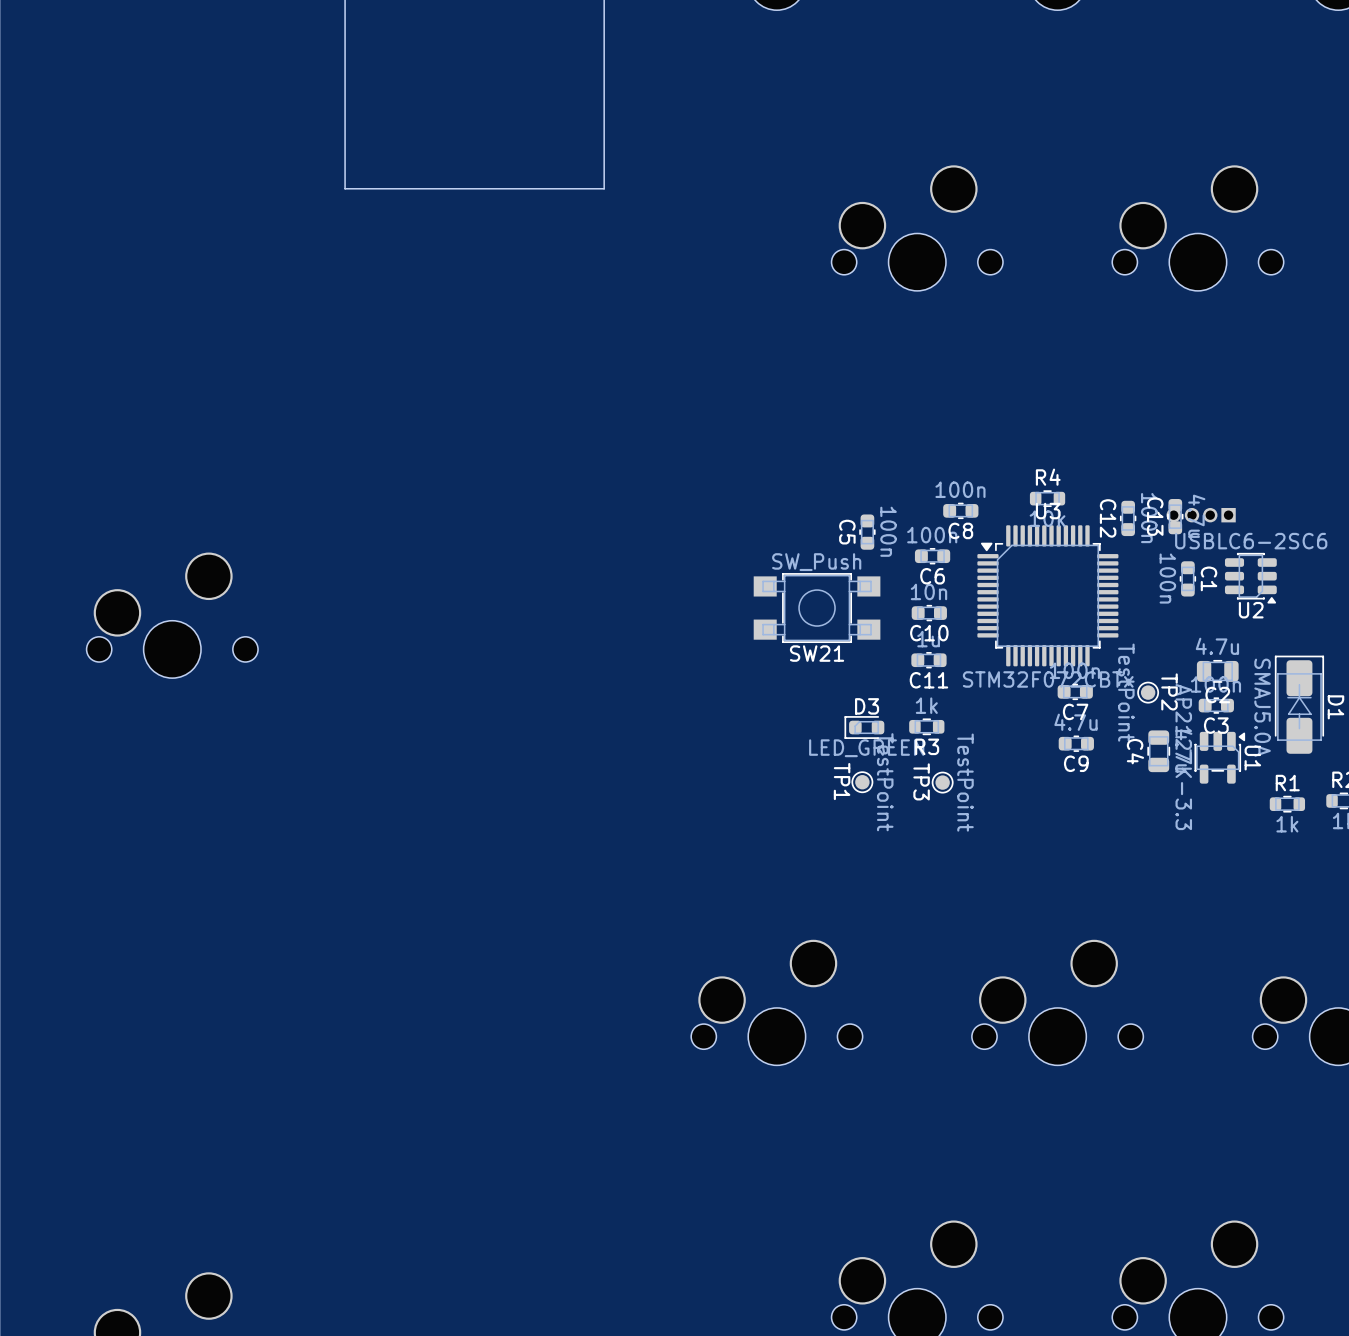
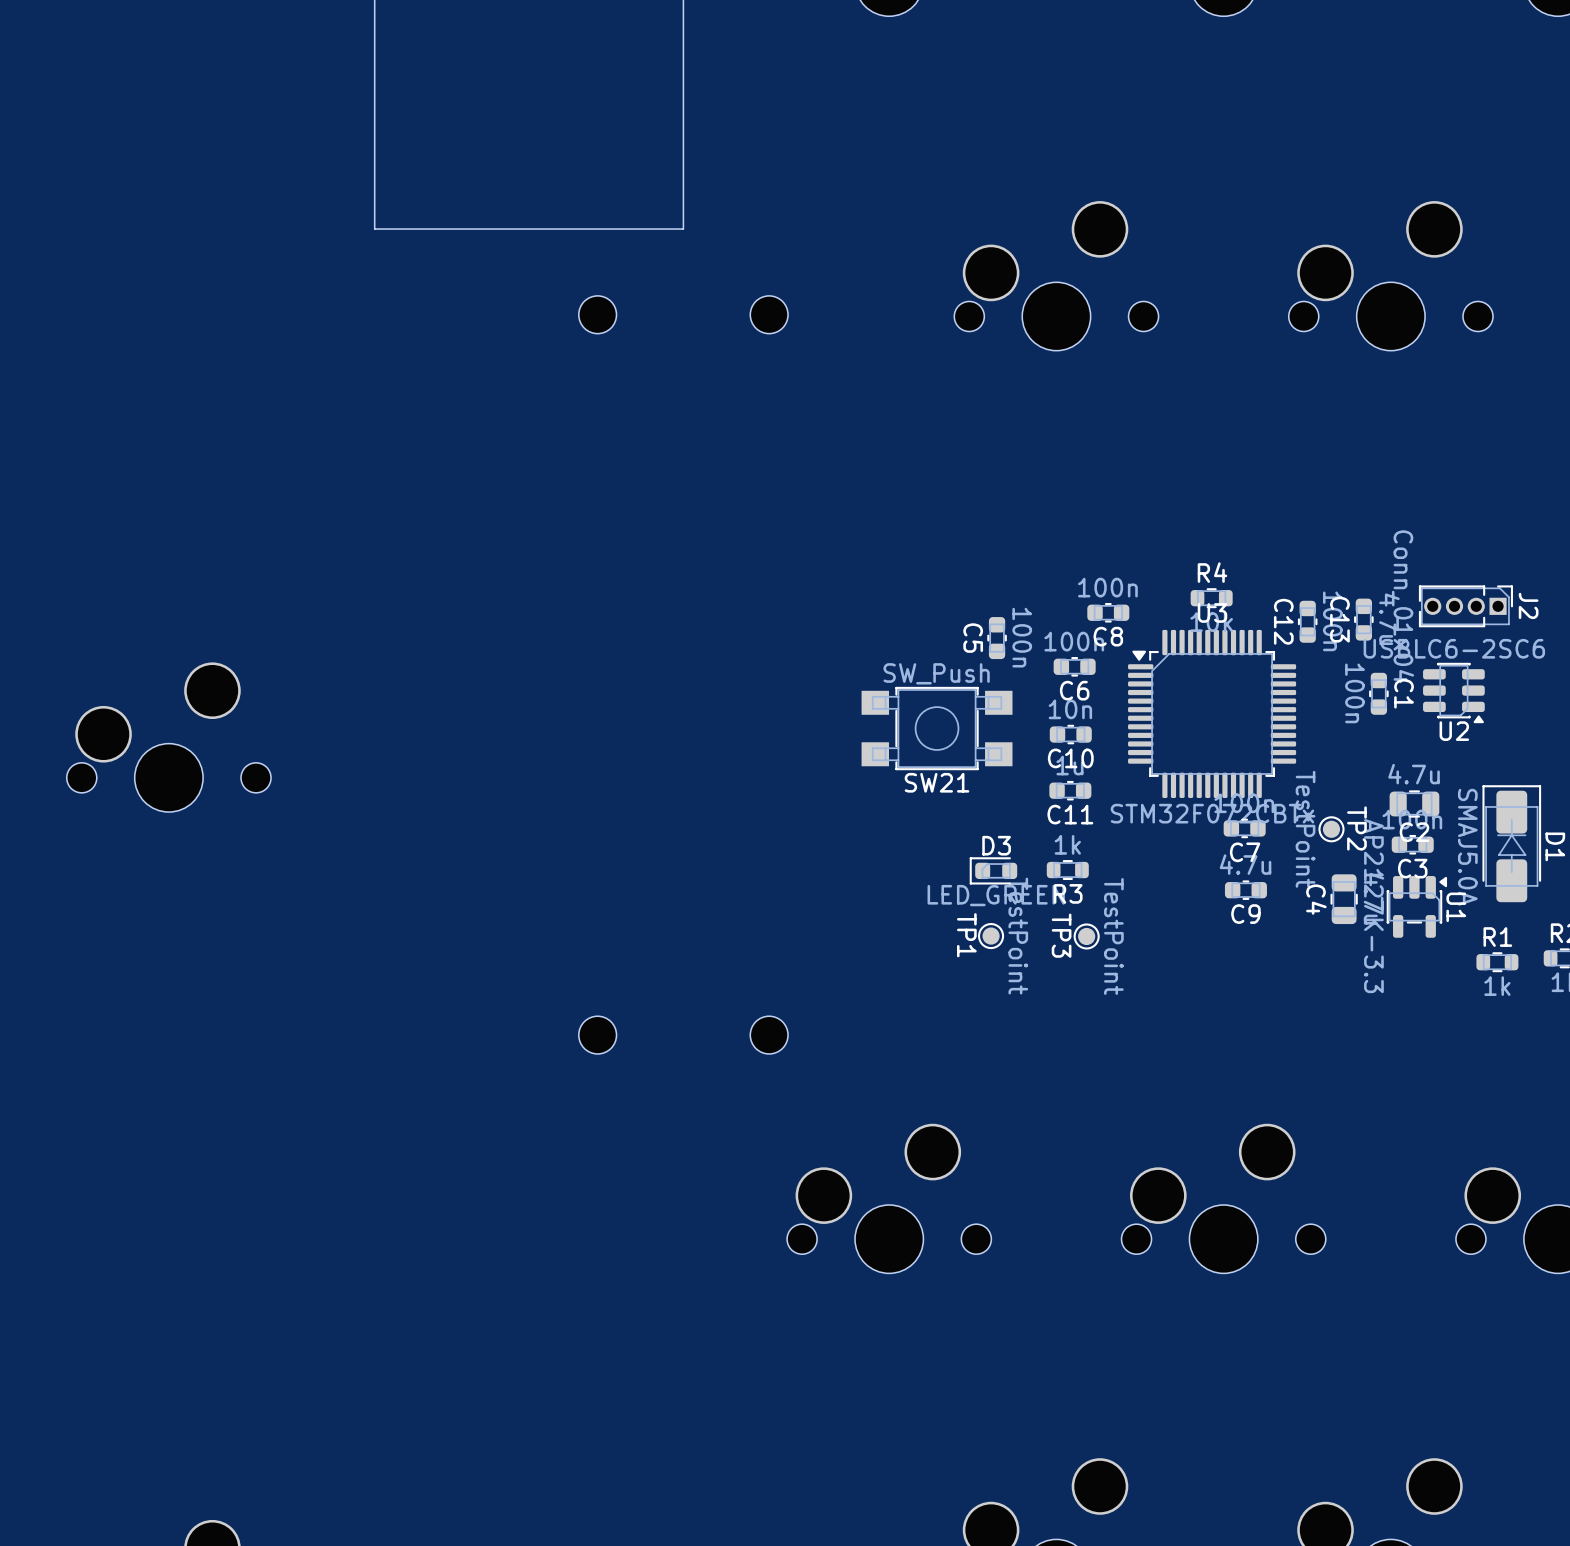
part: none -> (597, 314)
part: none -> (769, 314)
J2 side: top (1201, 515) -> bottom (1465, 606)
part: none -> (597, 1035)
part: none -> (769, 1035)

